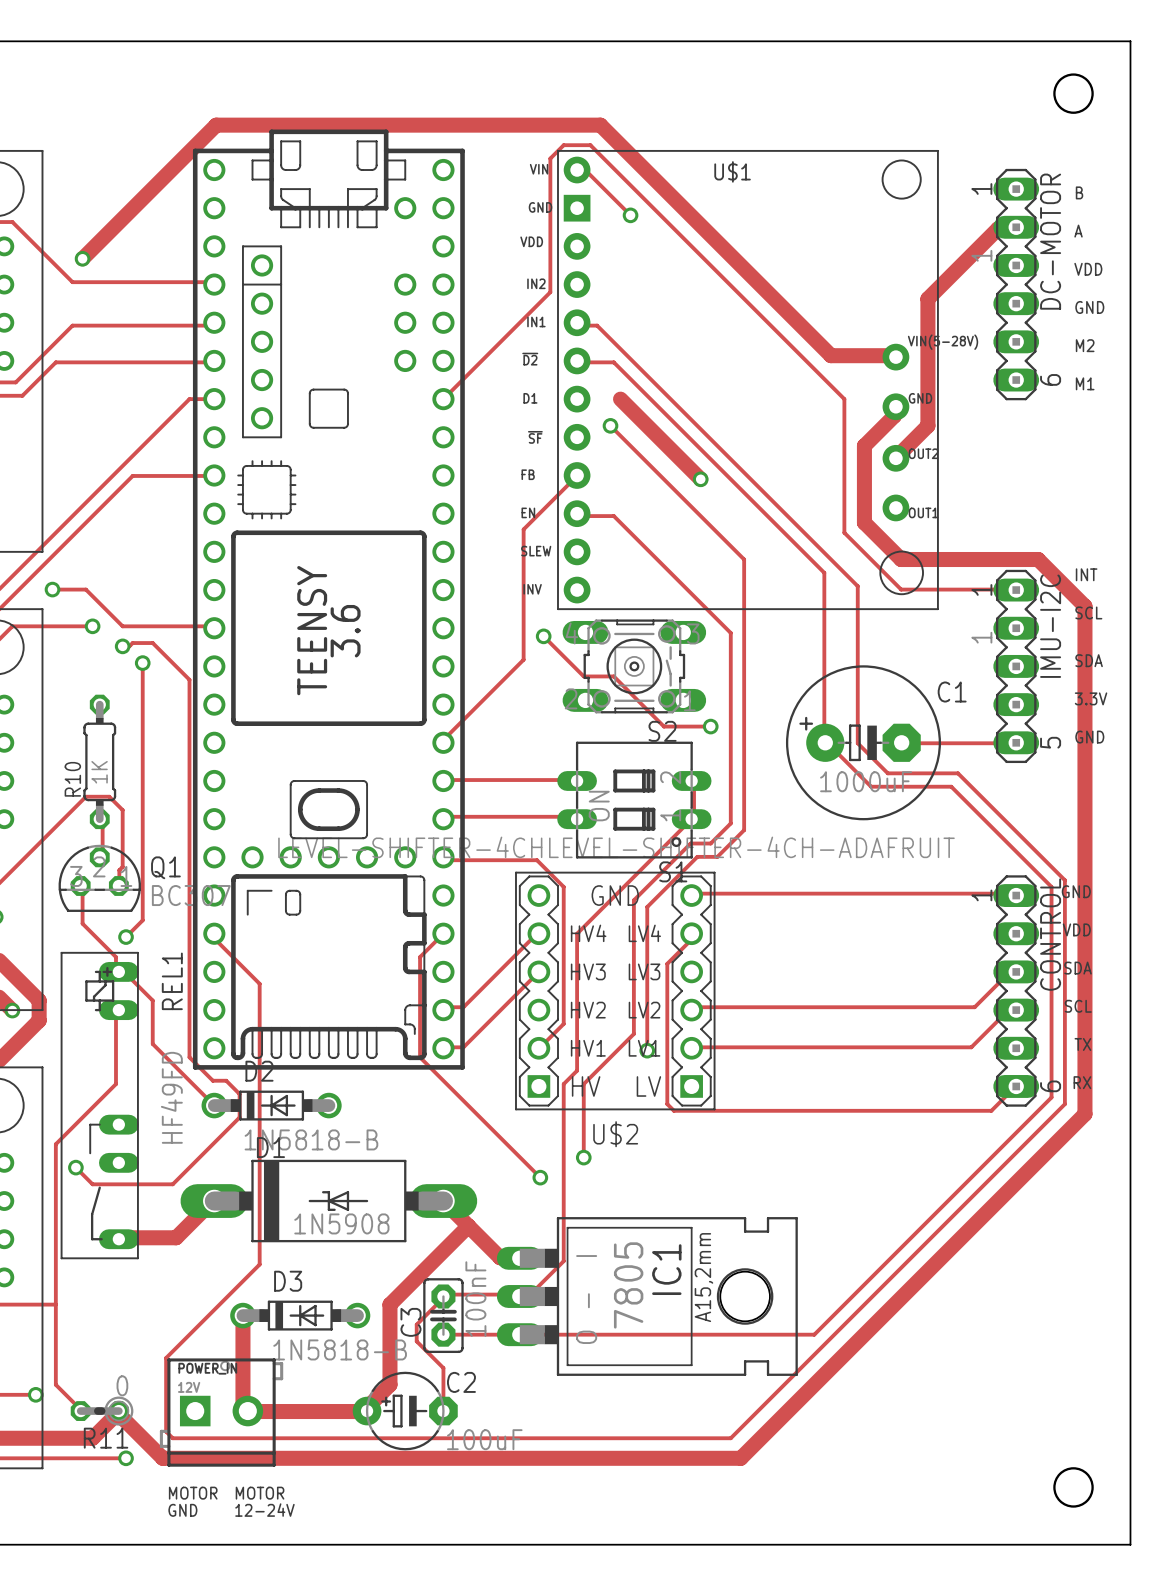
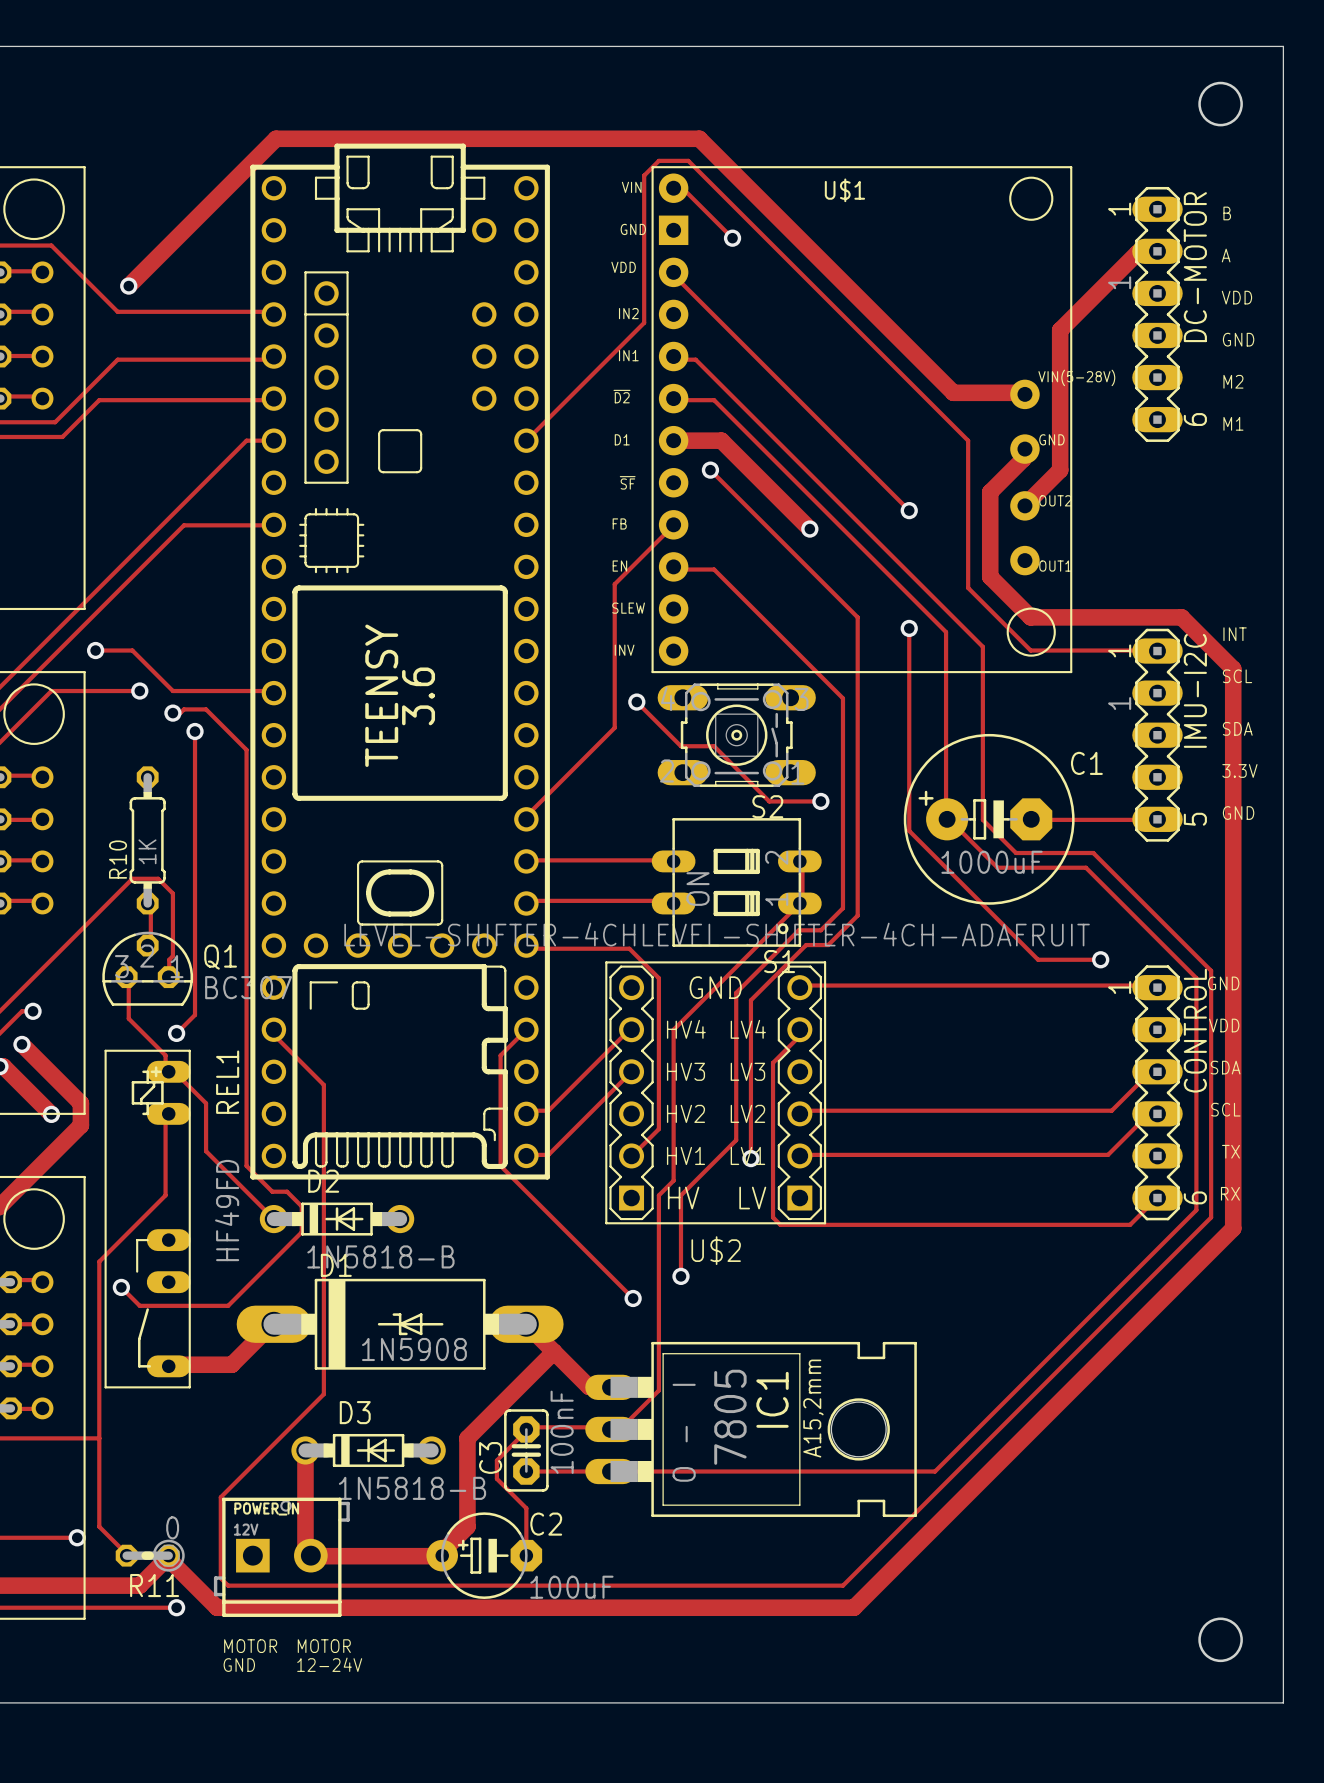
track: none -> (673, 272) (673, 275) (909, 510)
track: none -> (673, 440) (721, 440)
via: none -> (909, 510)
track: none -> (909, 628) (909, 830) (1038, 959) (1100, 959)
via: none -> (909, 628)
via: none -> (1100, 959)

